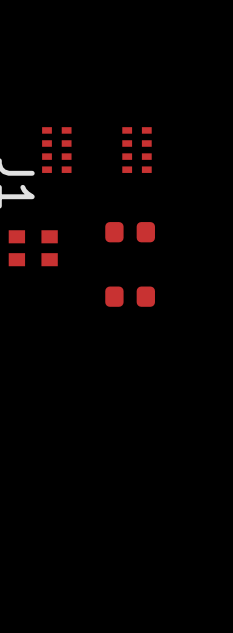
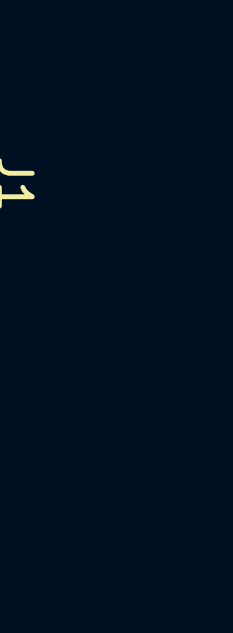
part: (56, 150) -> none
part: (136, 150) -> none
part: (130, 232) -> none
part: (33, 248) -> none
part: (130, 296) -> none

